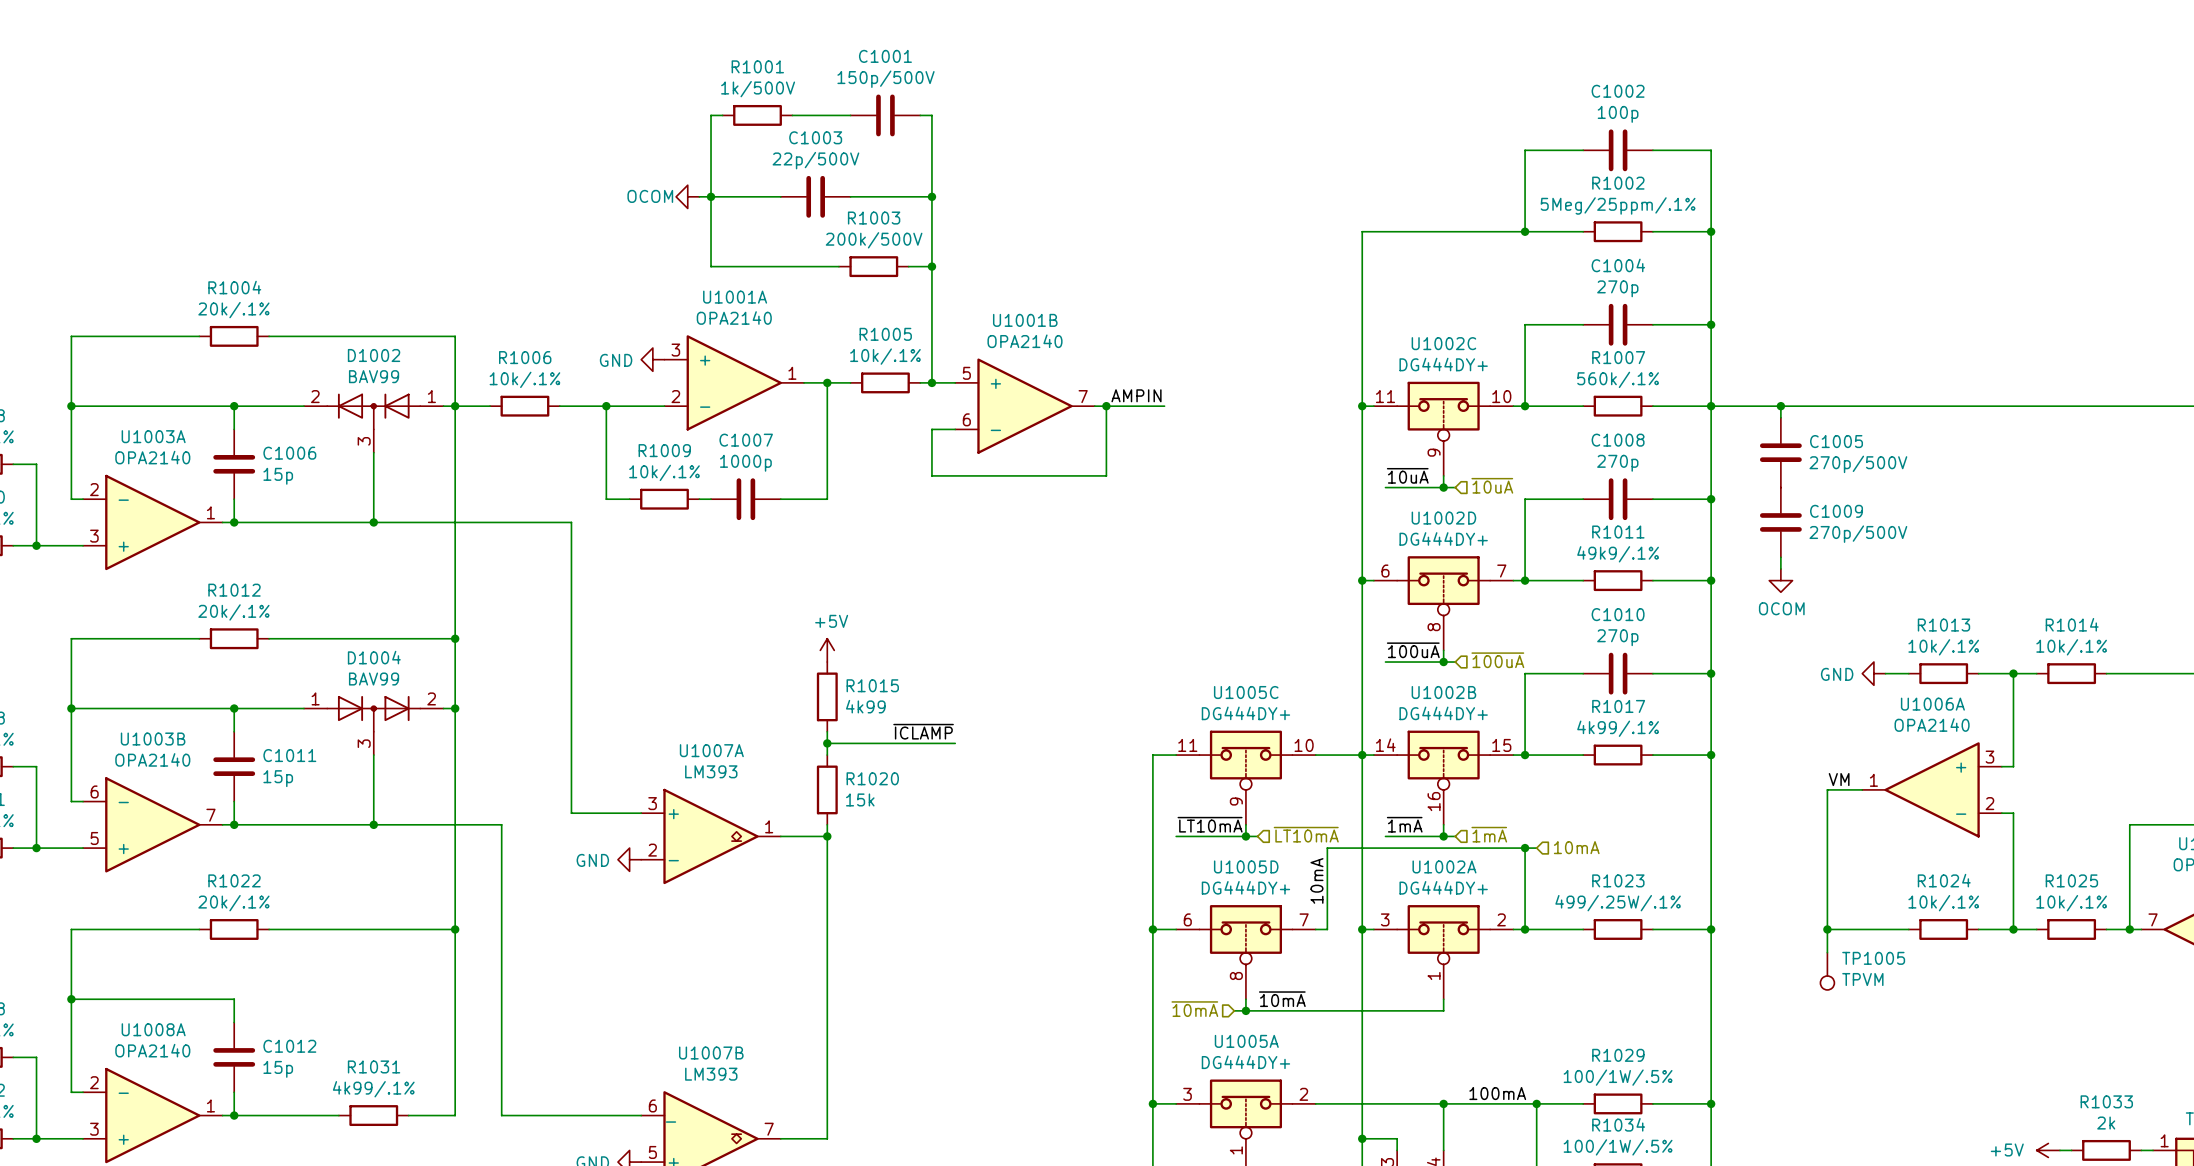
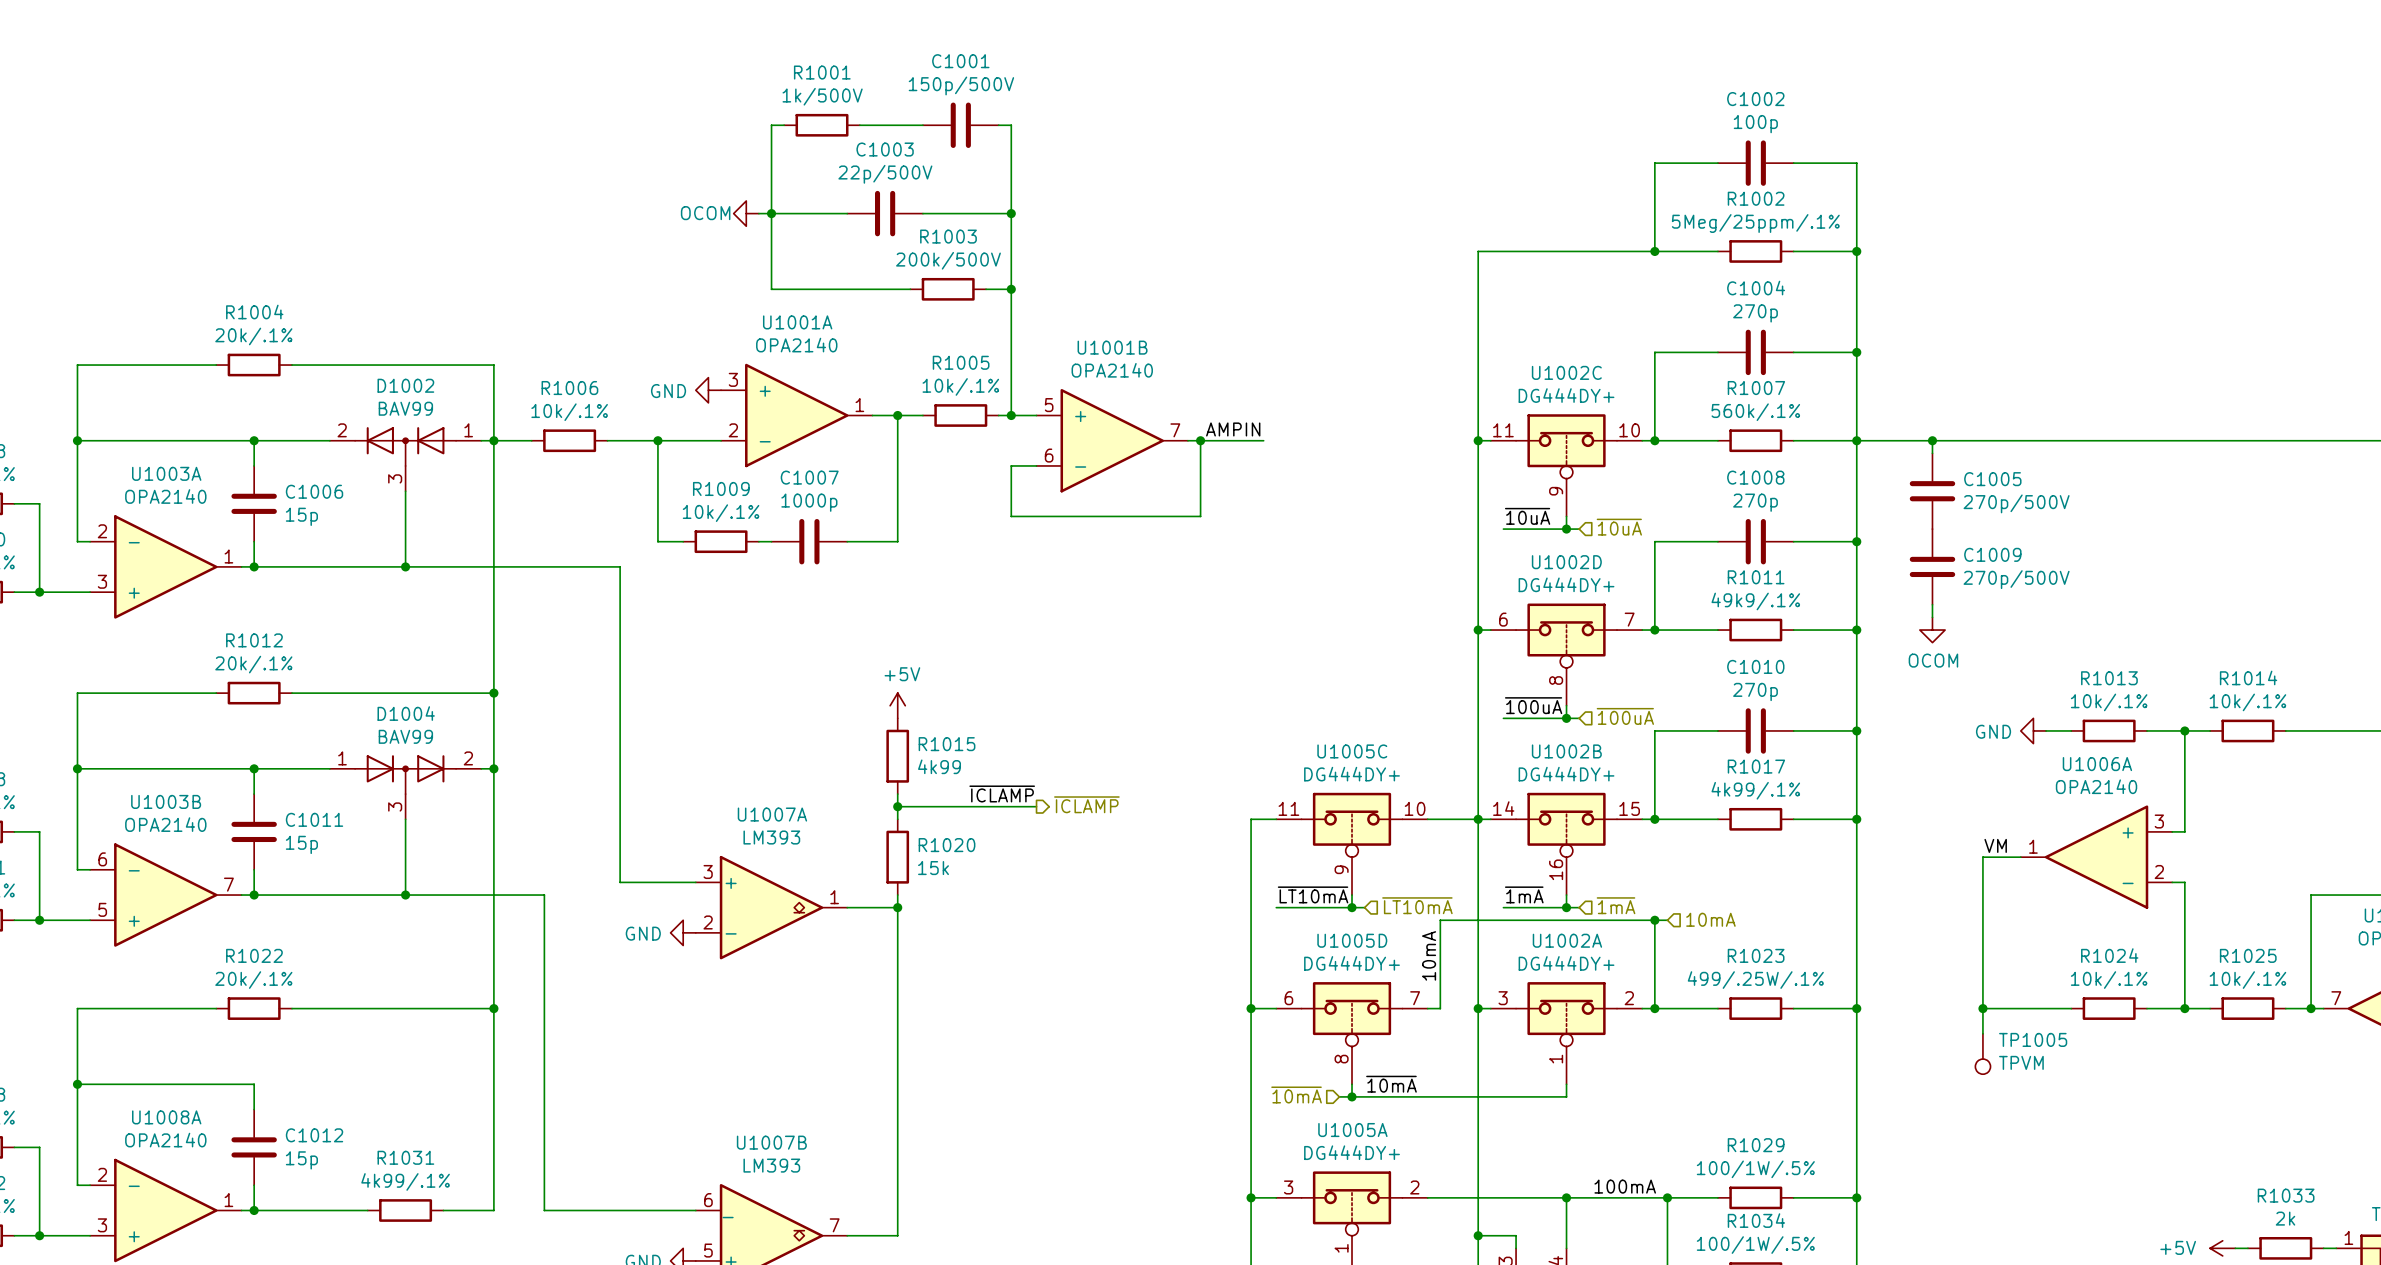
hierarchical label: none -> ~{ICLAMP} (1086, 804)

